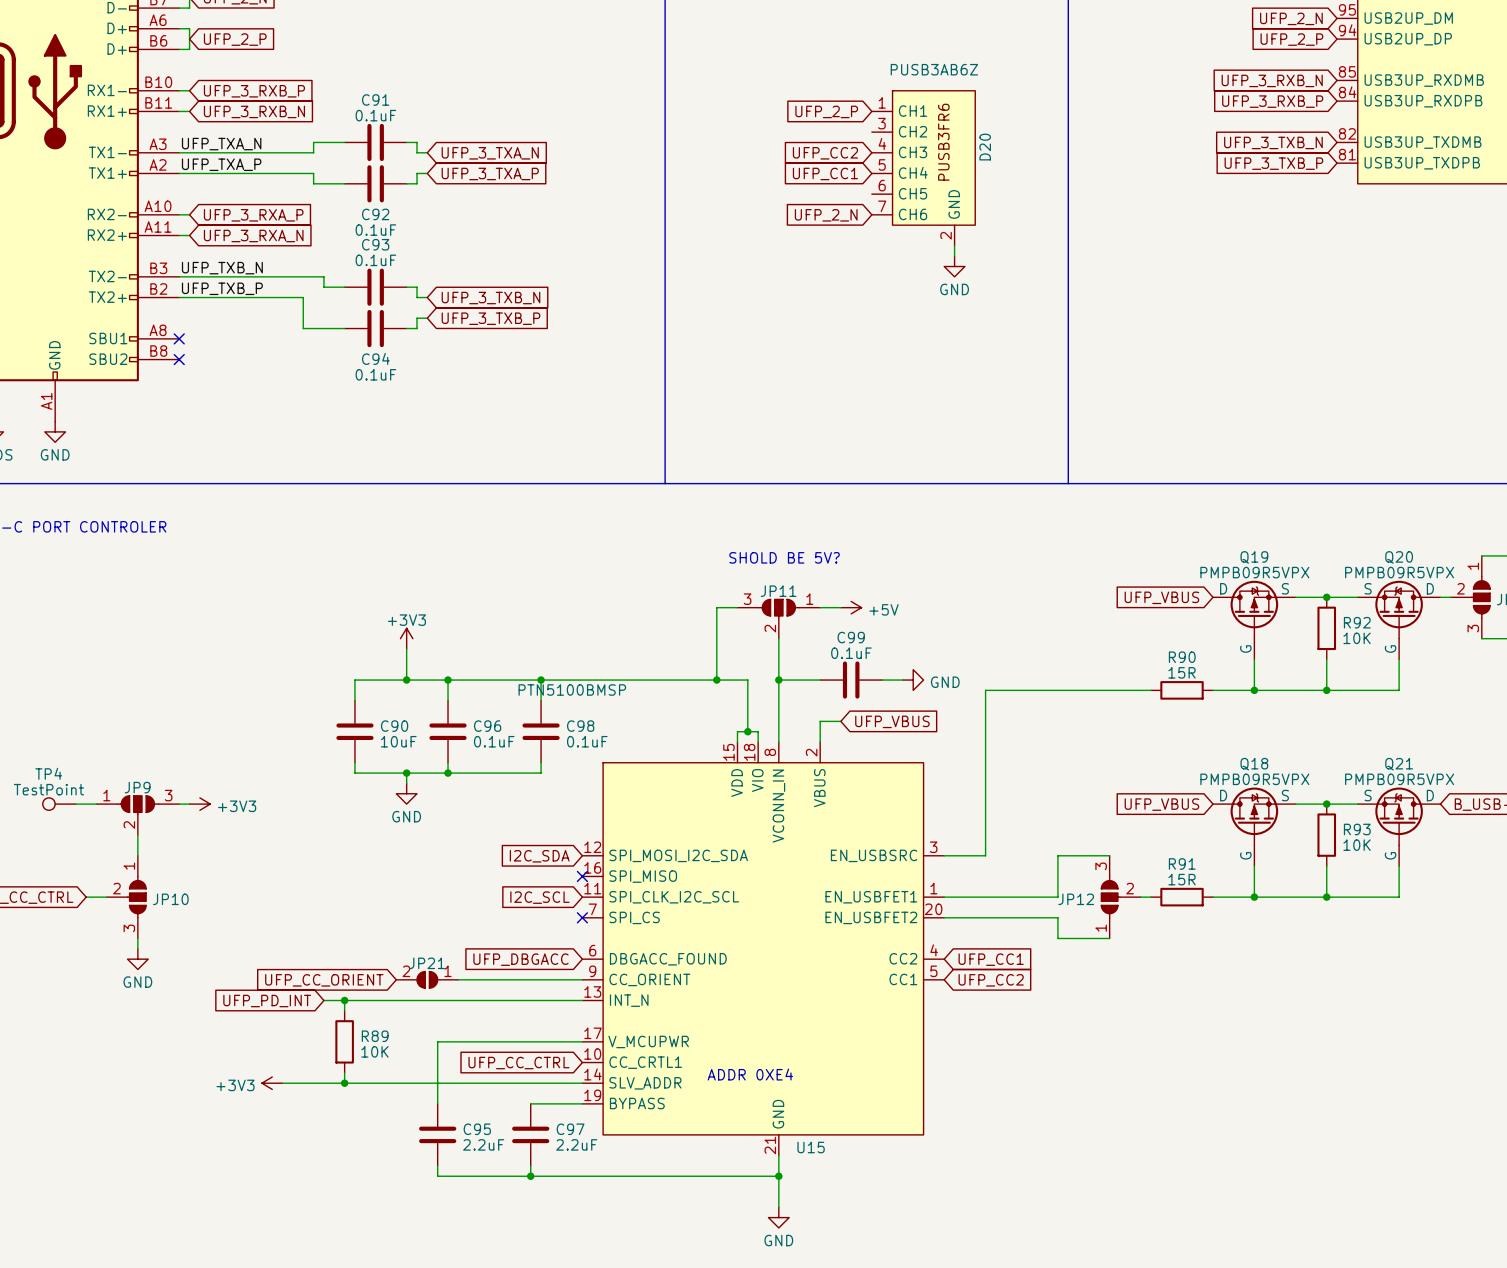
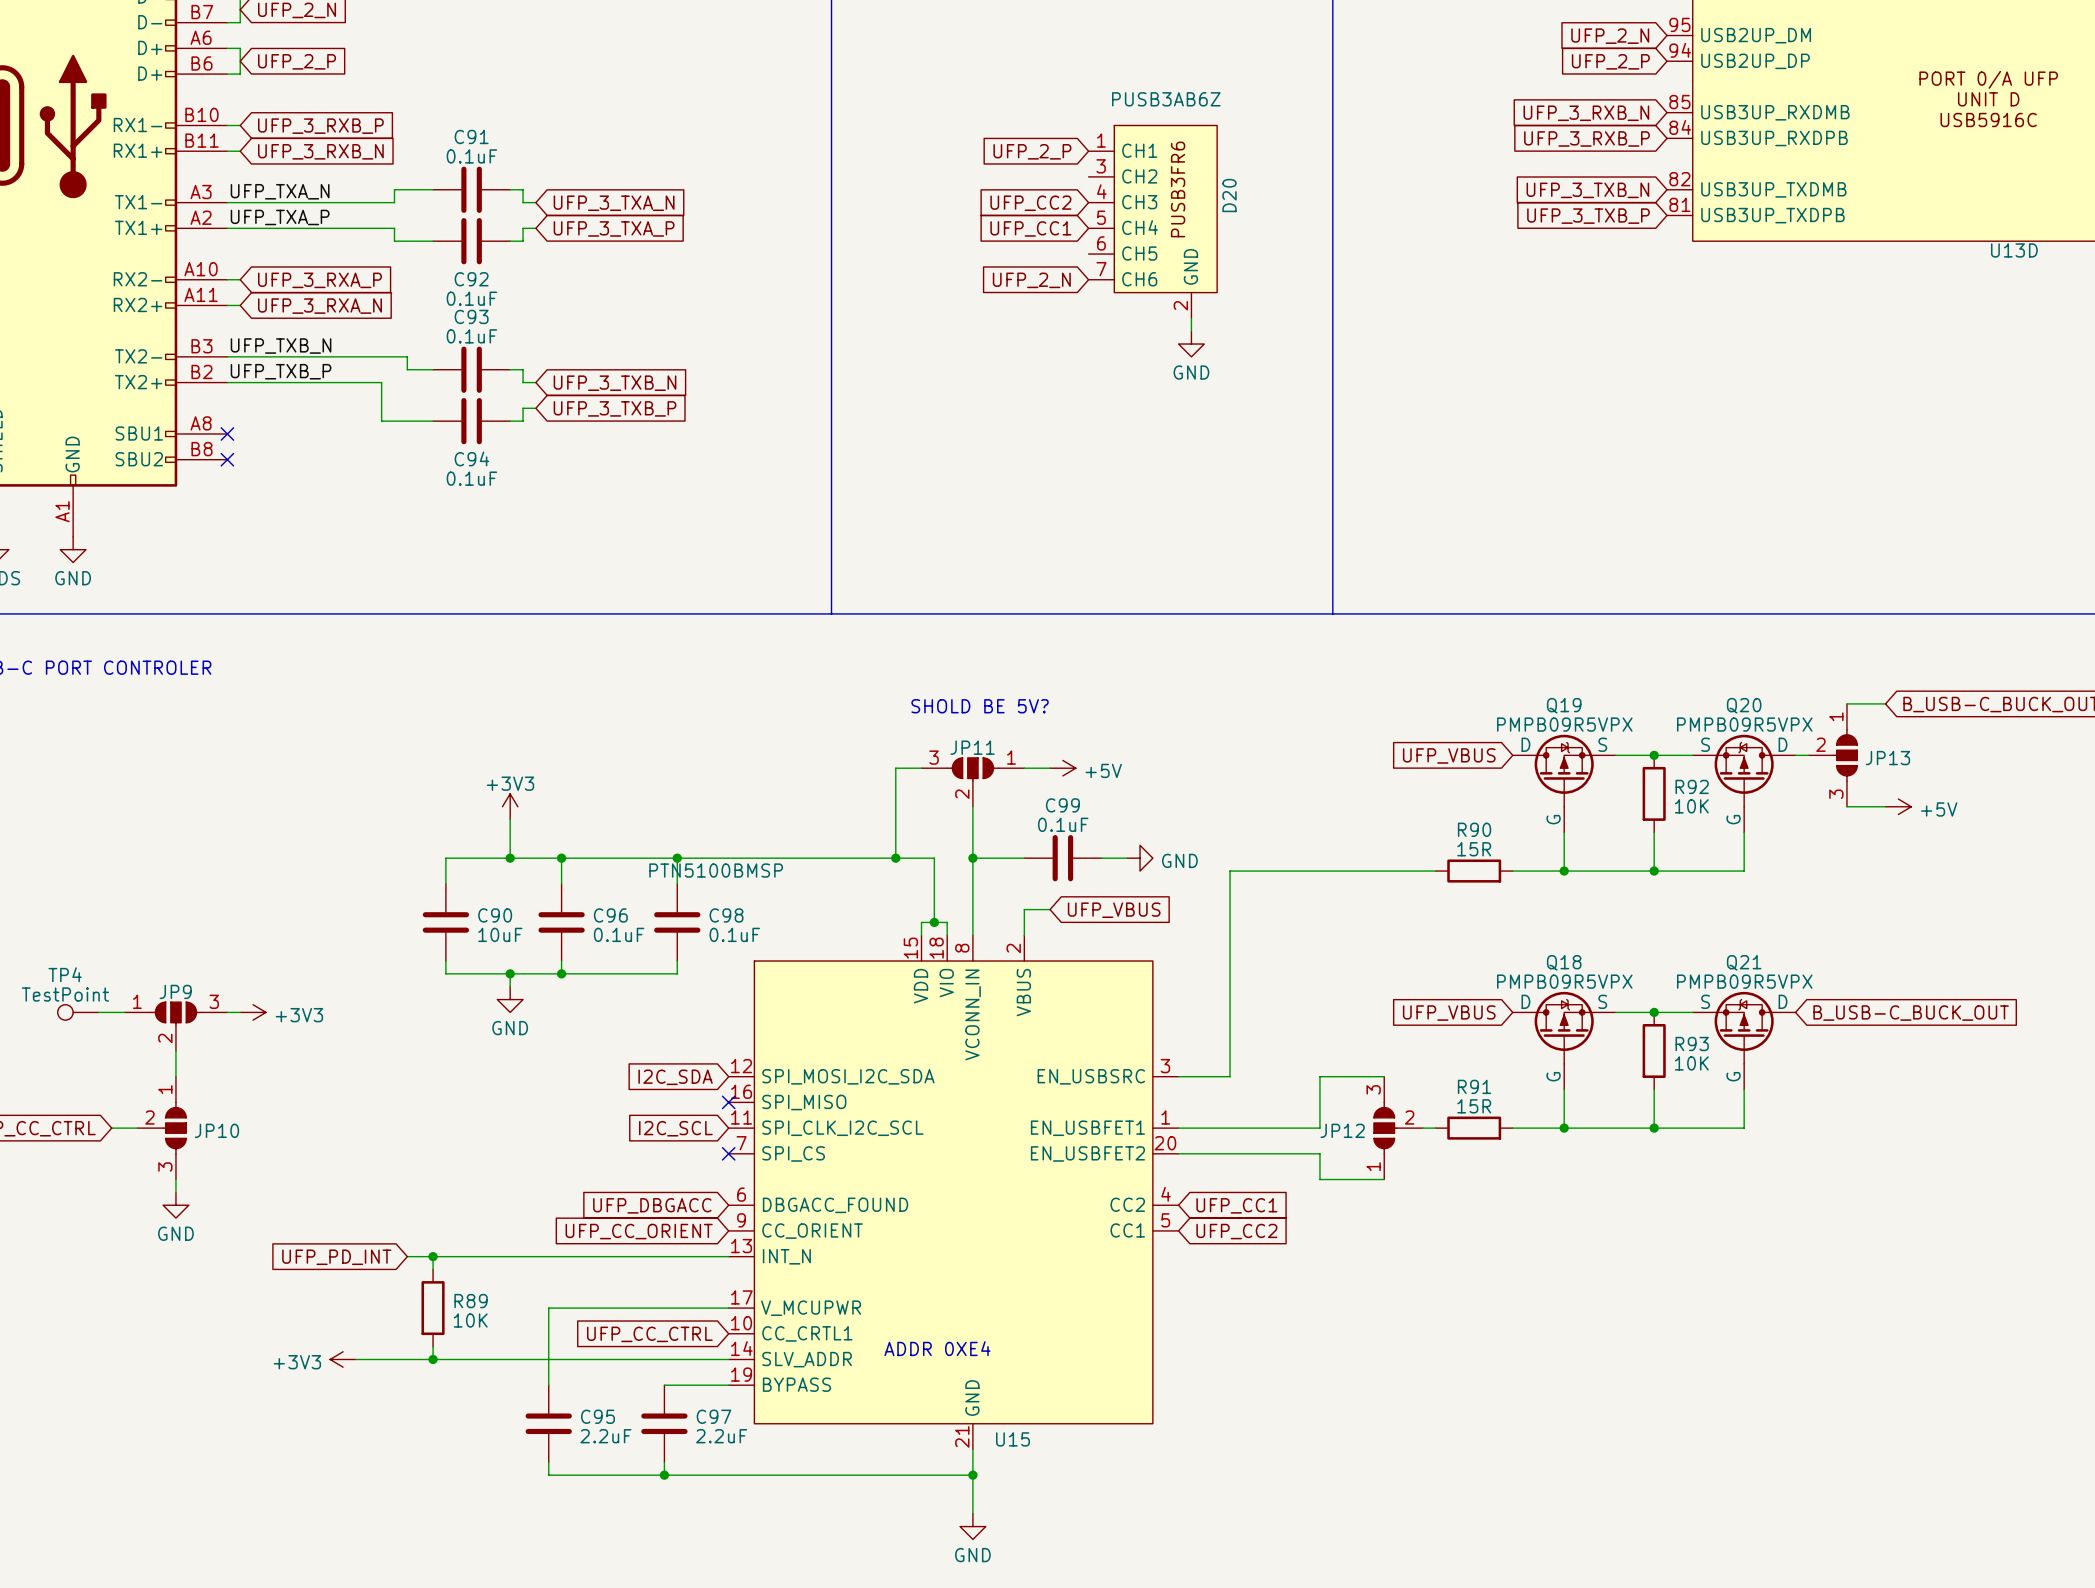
JP21: (427, 979) -> none
wire: (458, 979) (582, 979) -> none
global label position: UFP_CC_ORIENT (324, 980) -> UFP_CC_ORIENT (639, 1231)

